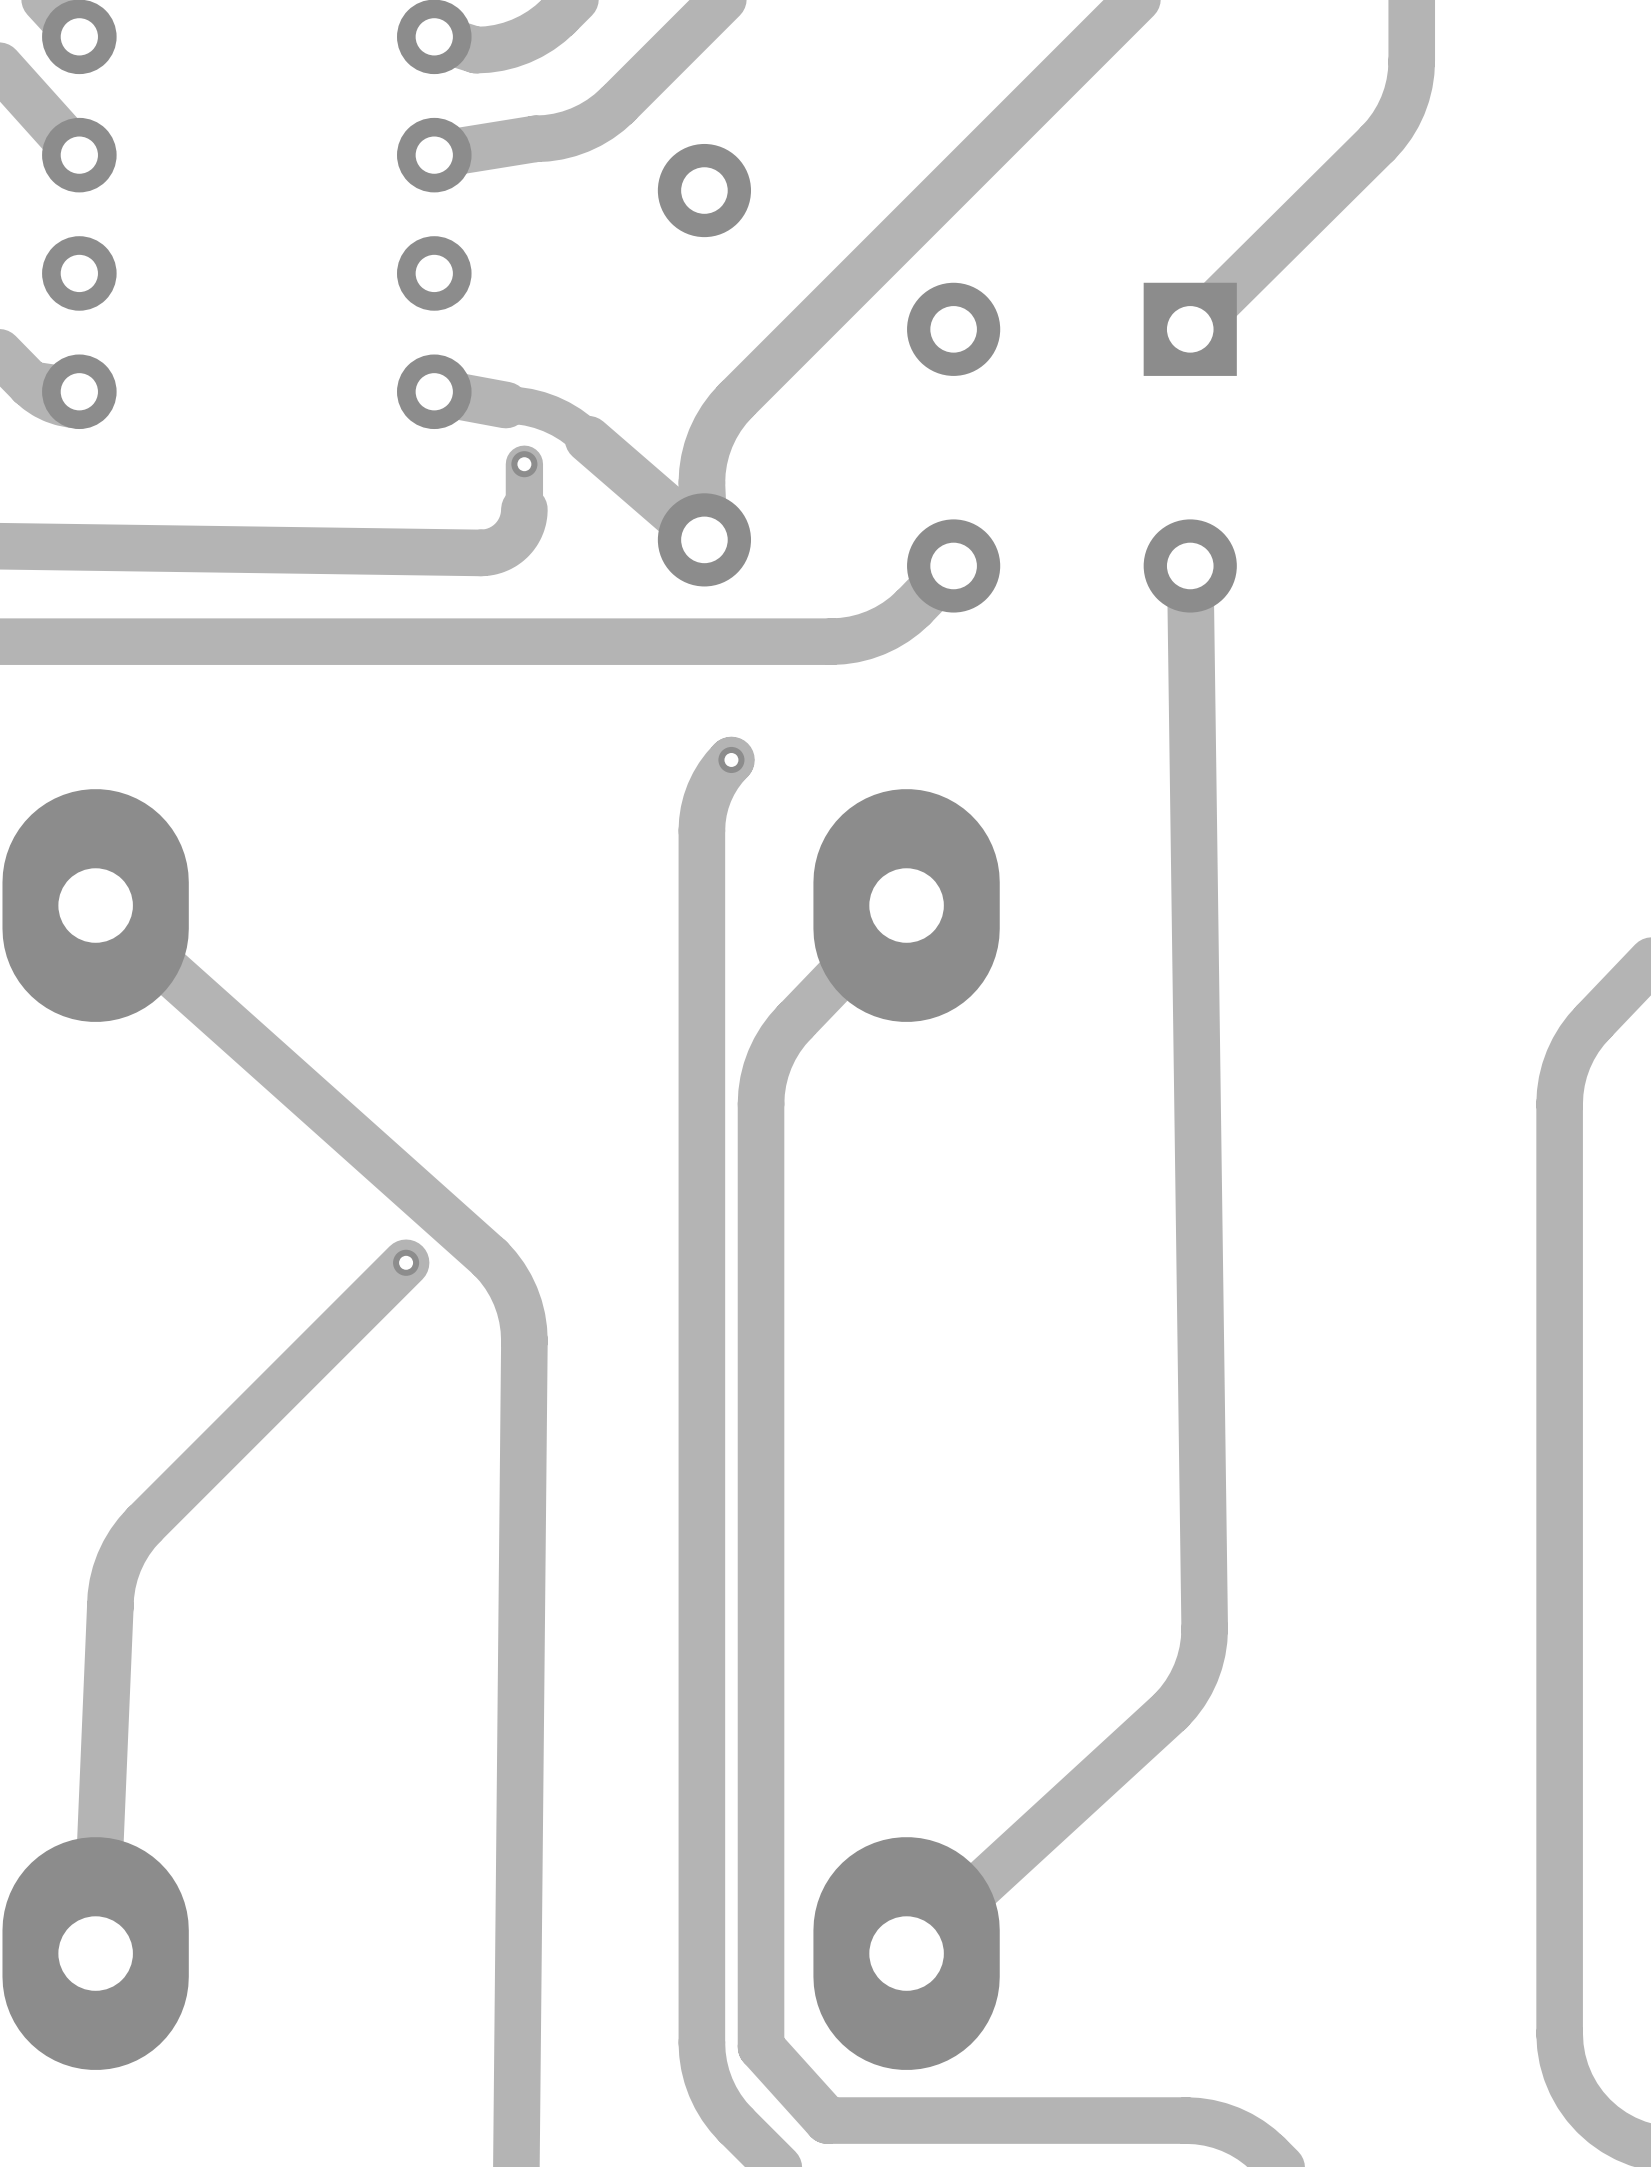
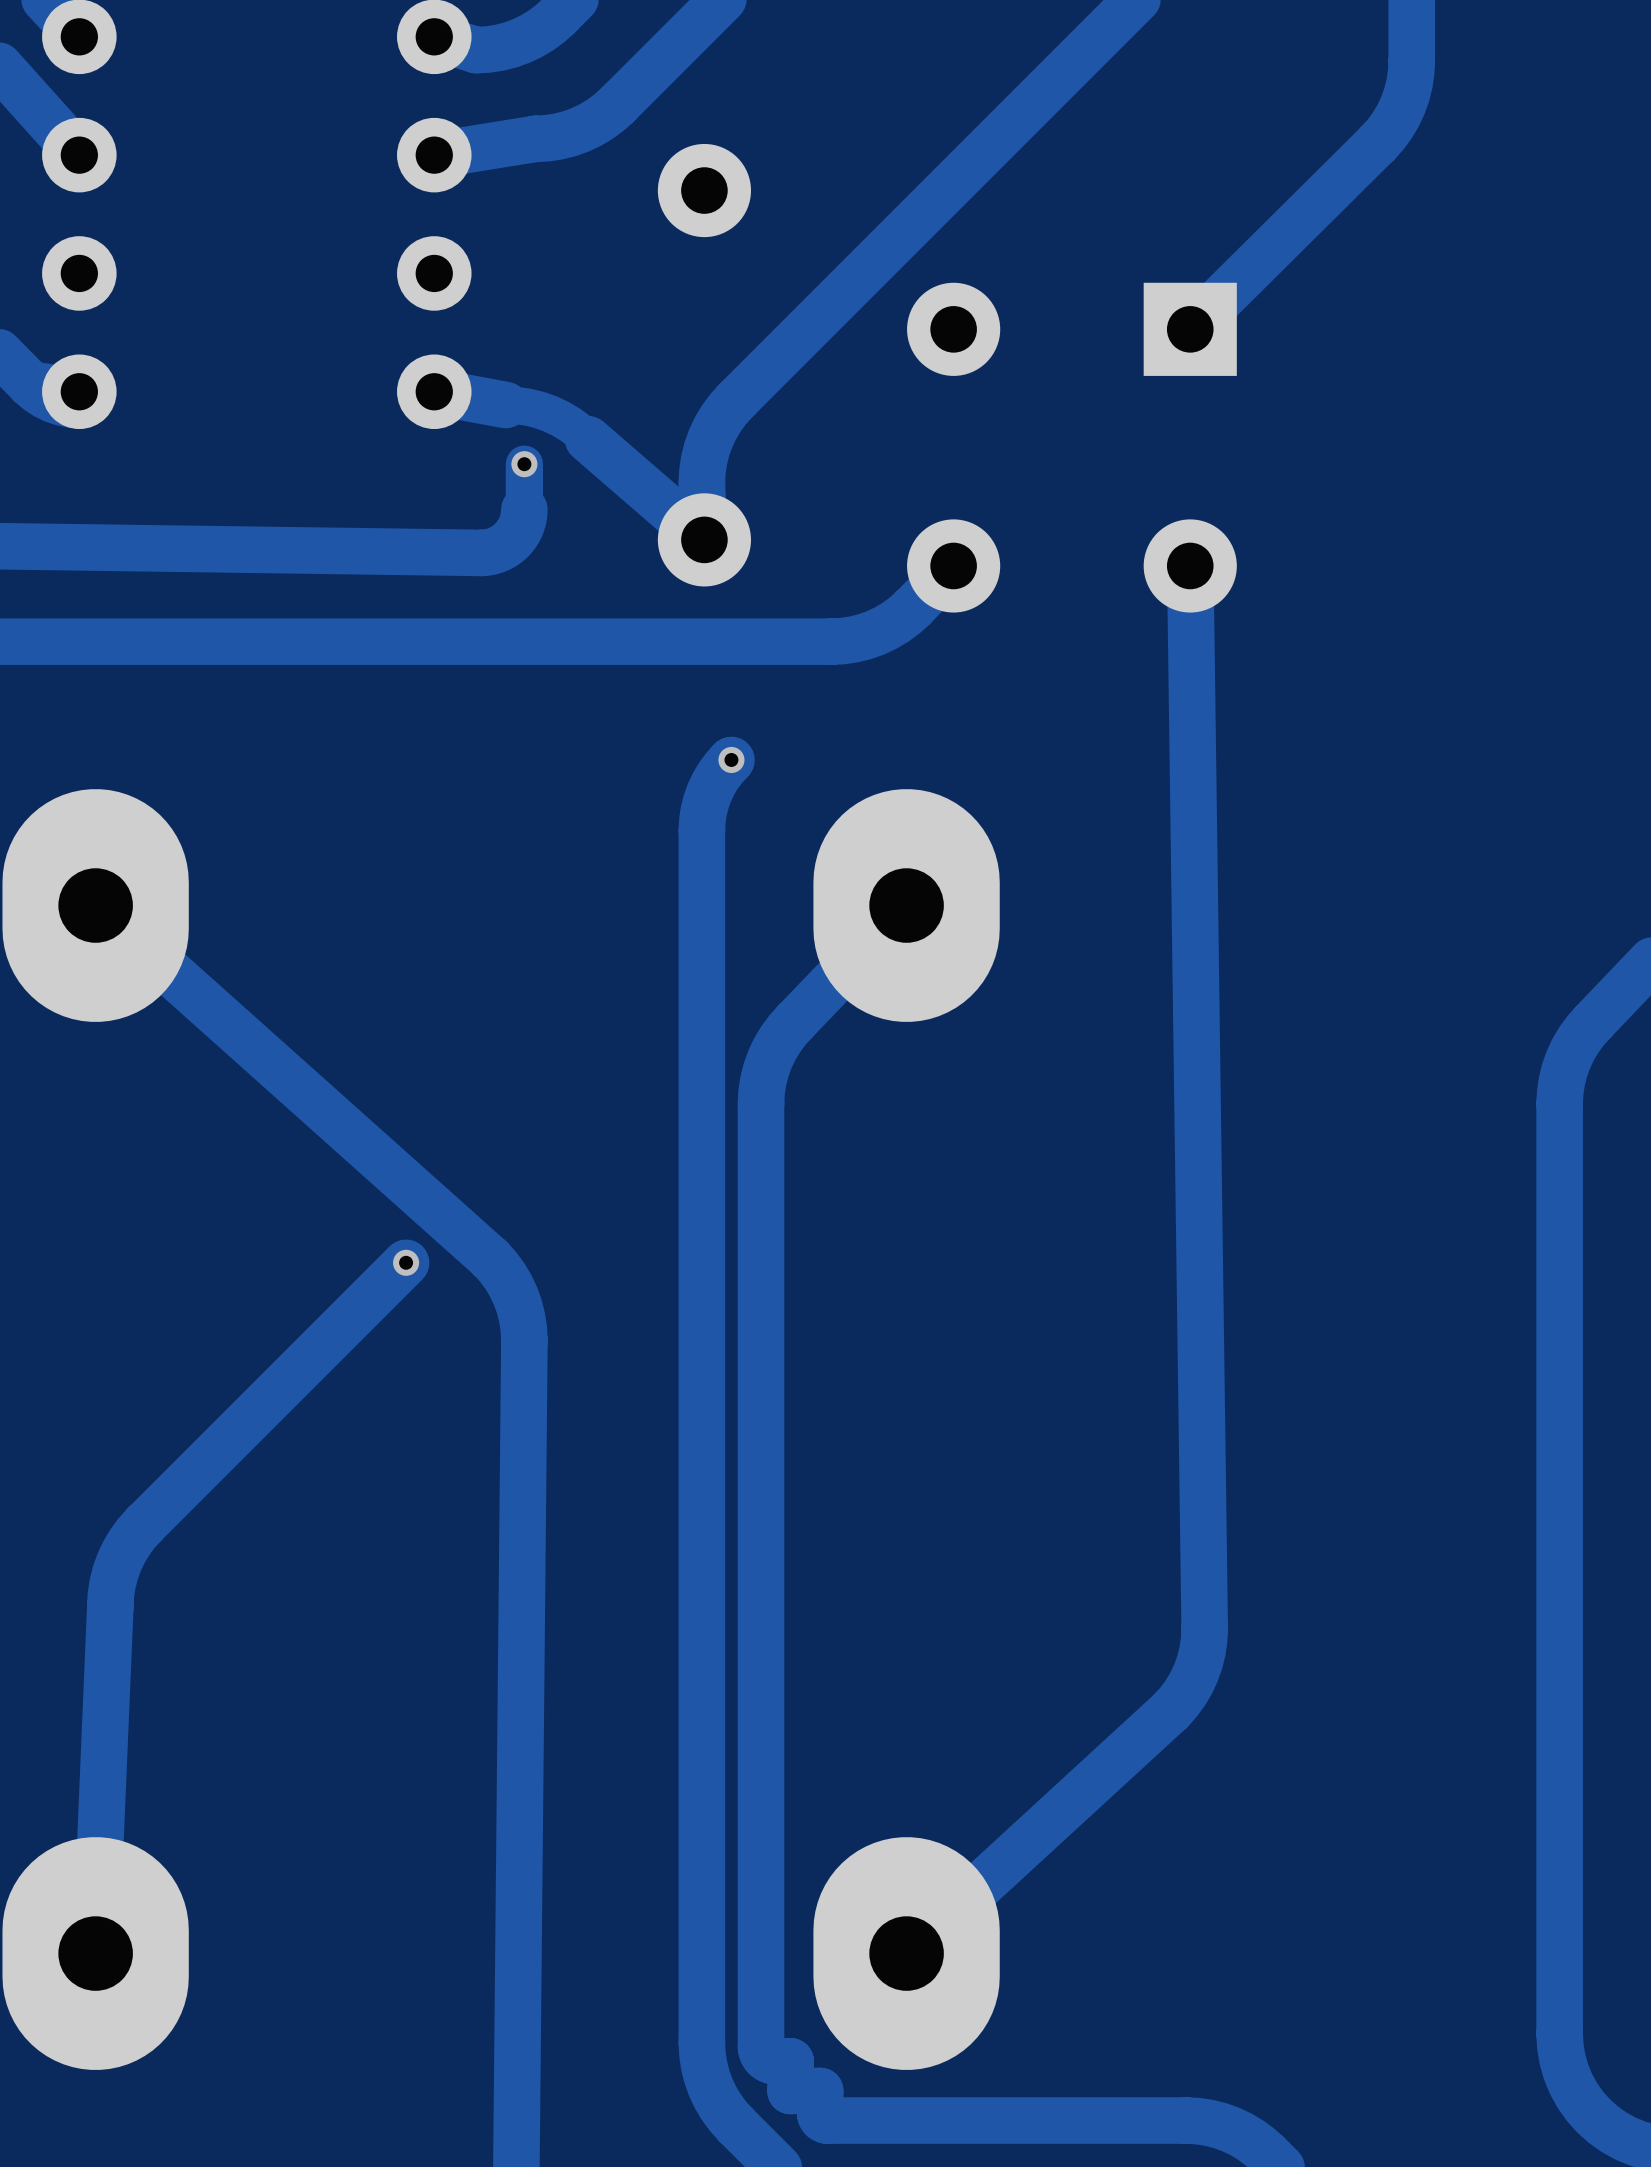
track: (761, 2046) (827, 2120) -> (761, 2046) (763, 2054) (769, 2059) (790, 2061) (790, 2090) (820, 2090) (820, 2115) (827, 2120)

